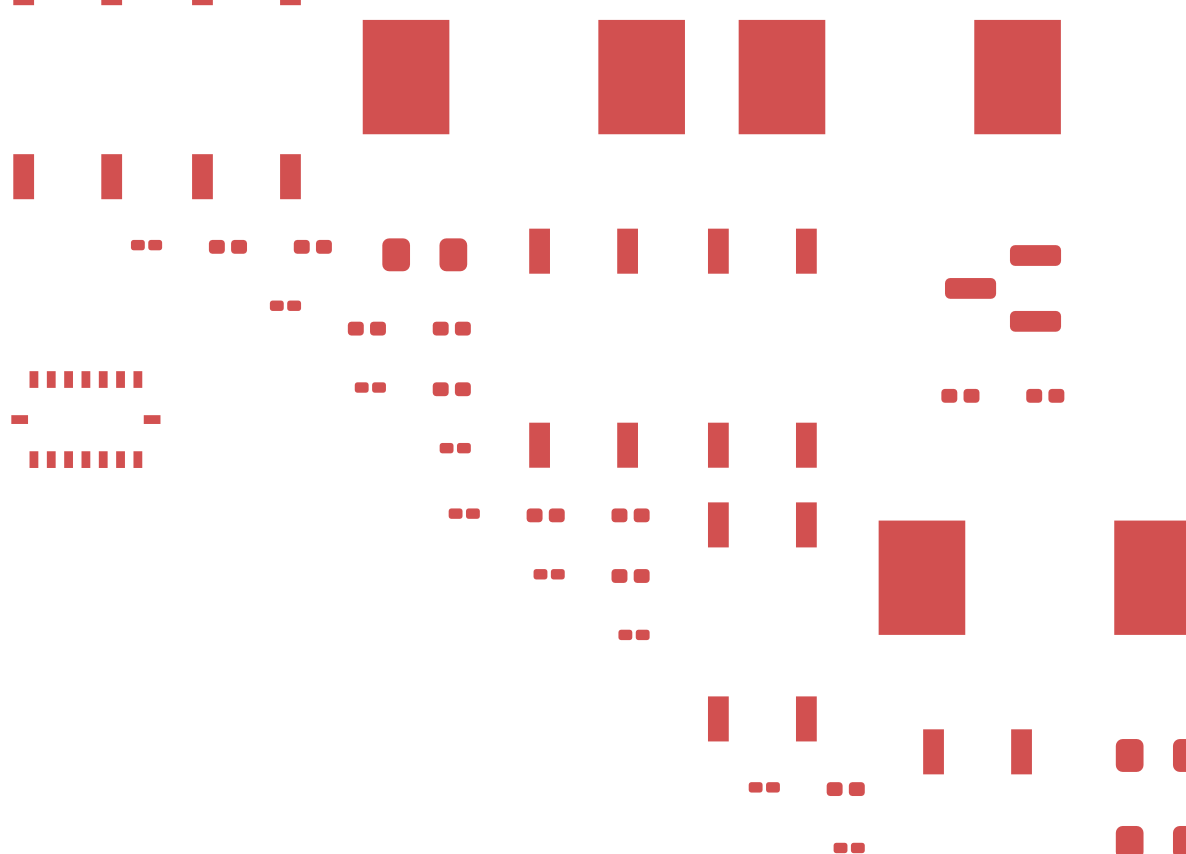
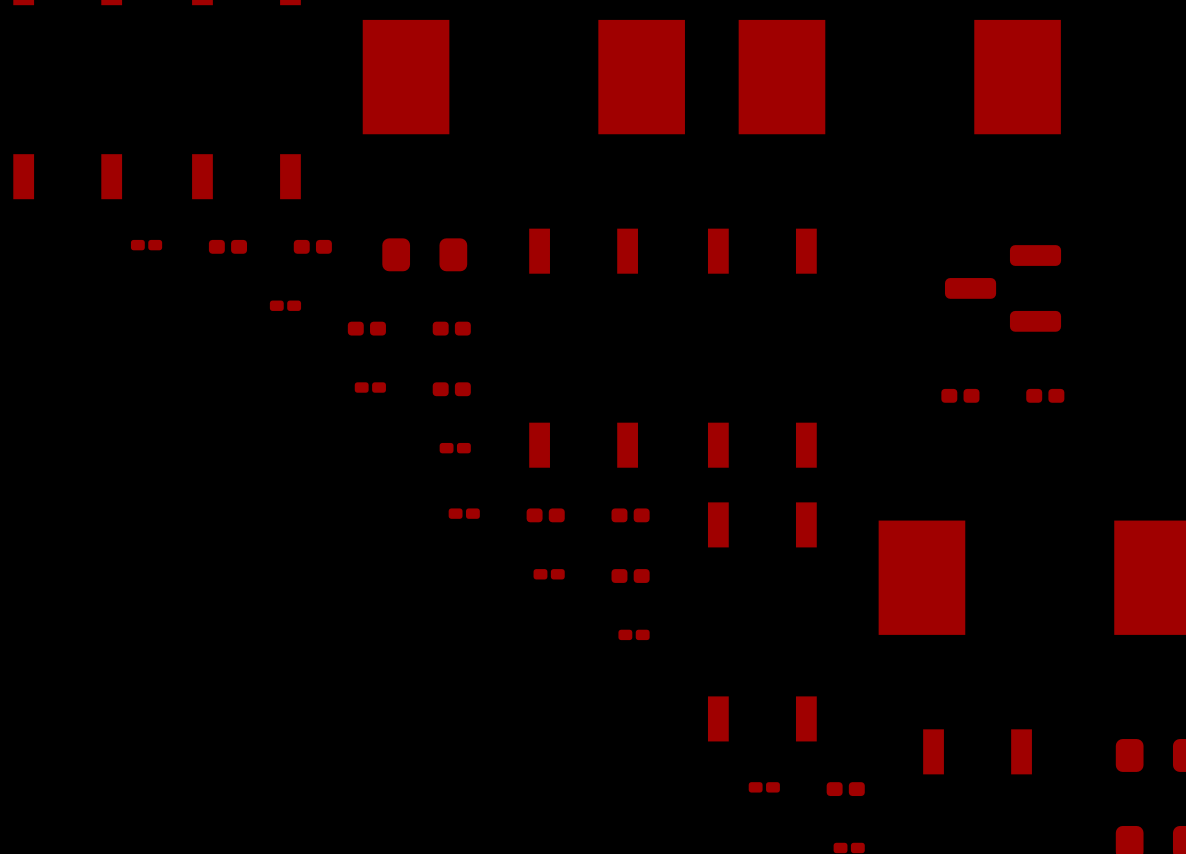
part: (85, 419) -> none

